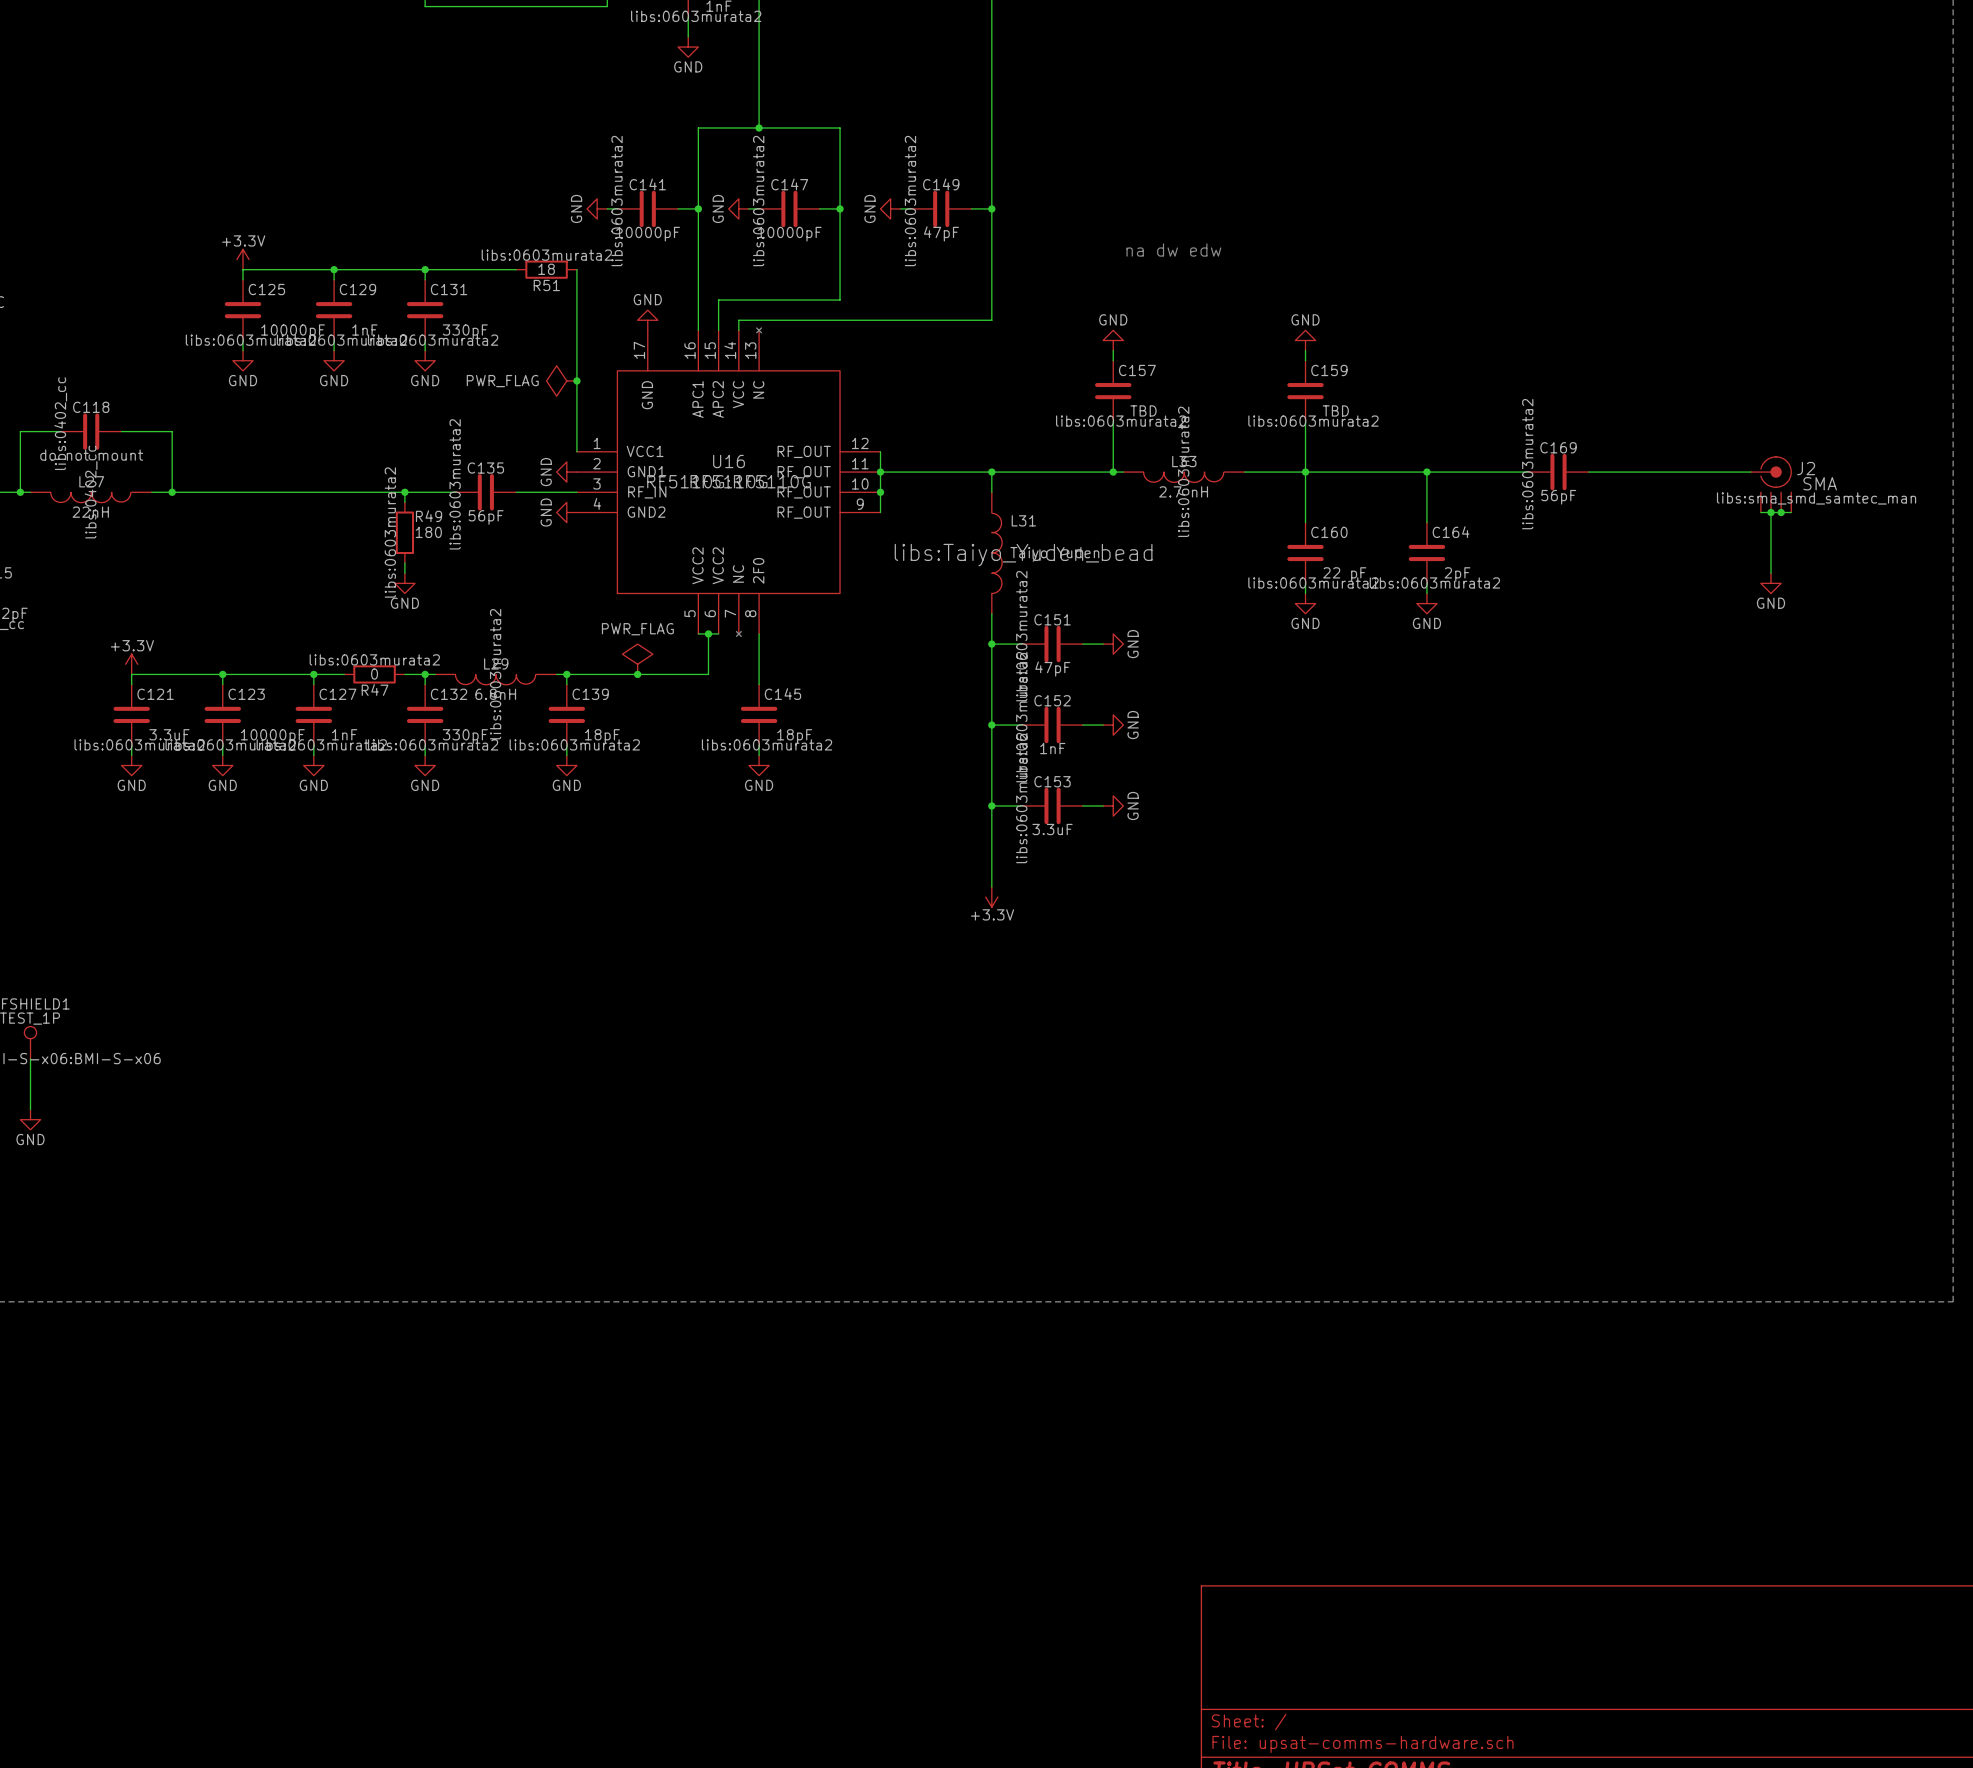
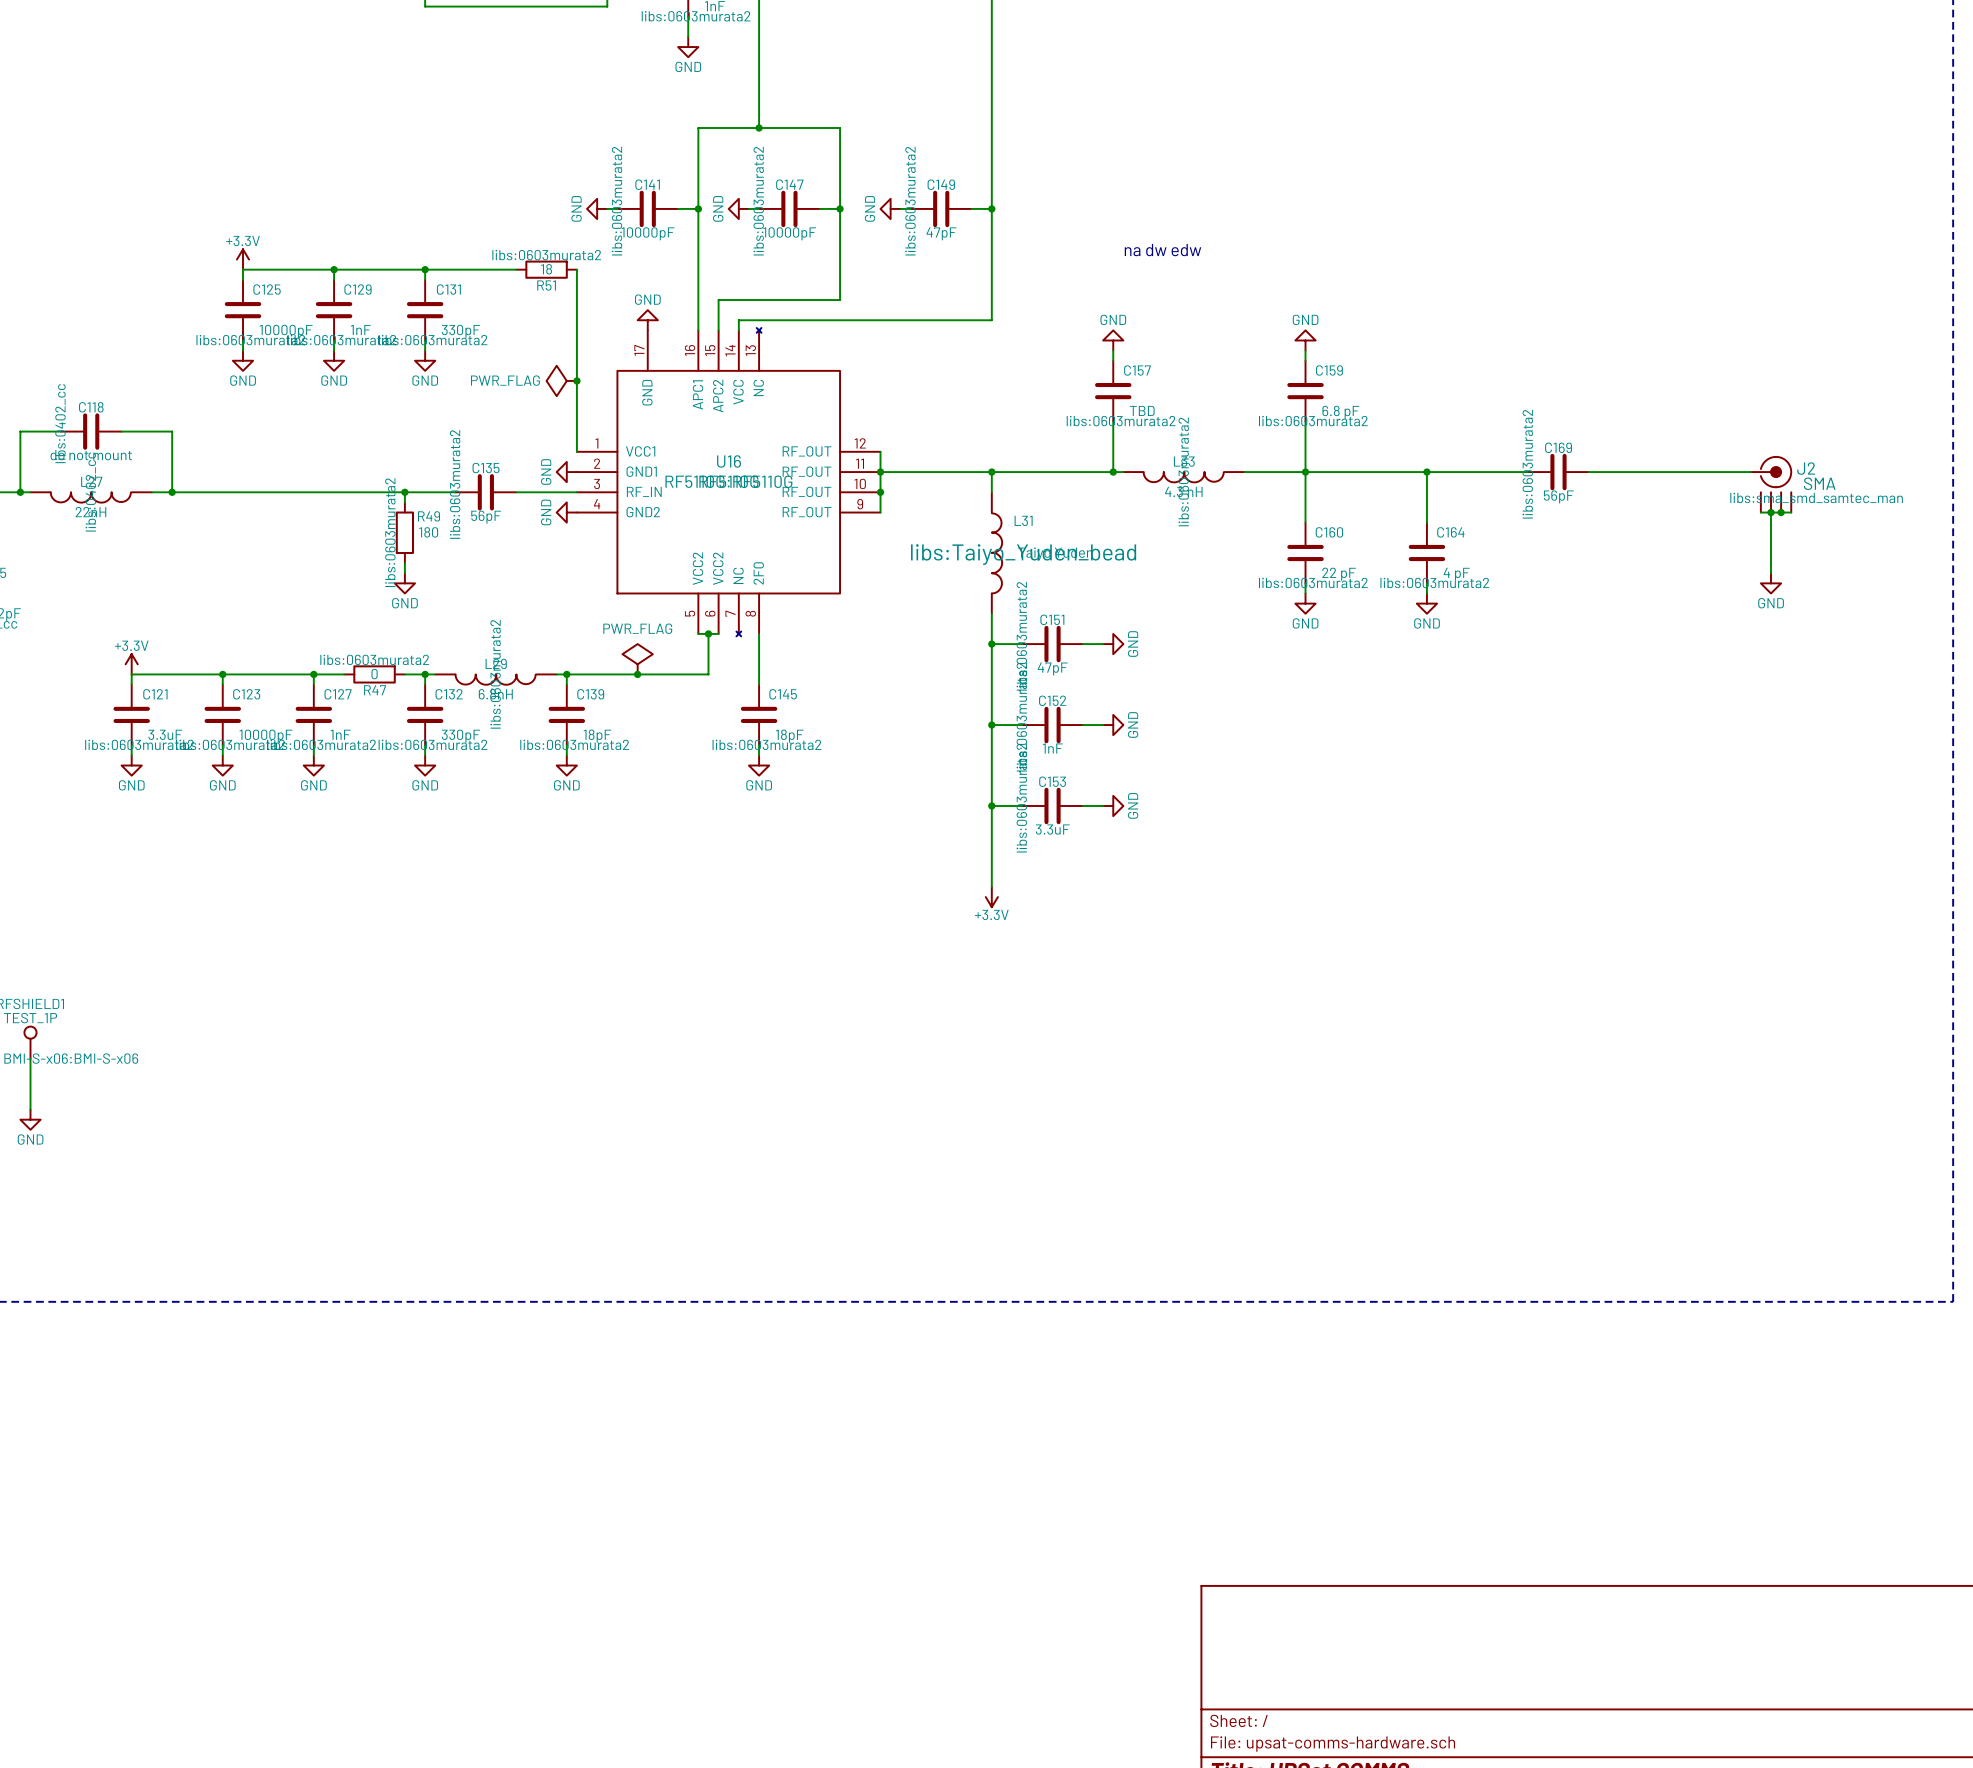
C159 value: TBD (1335, 410) -> 6.8 pF (1340, 412)
L33 value: 2.7 nH (1183, 491) -> 4.3 nH (1183, 491)
C164 value: 2pF (1457, 574) -> 4 pF (1456, 574)

